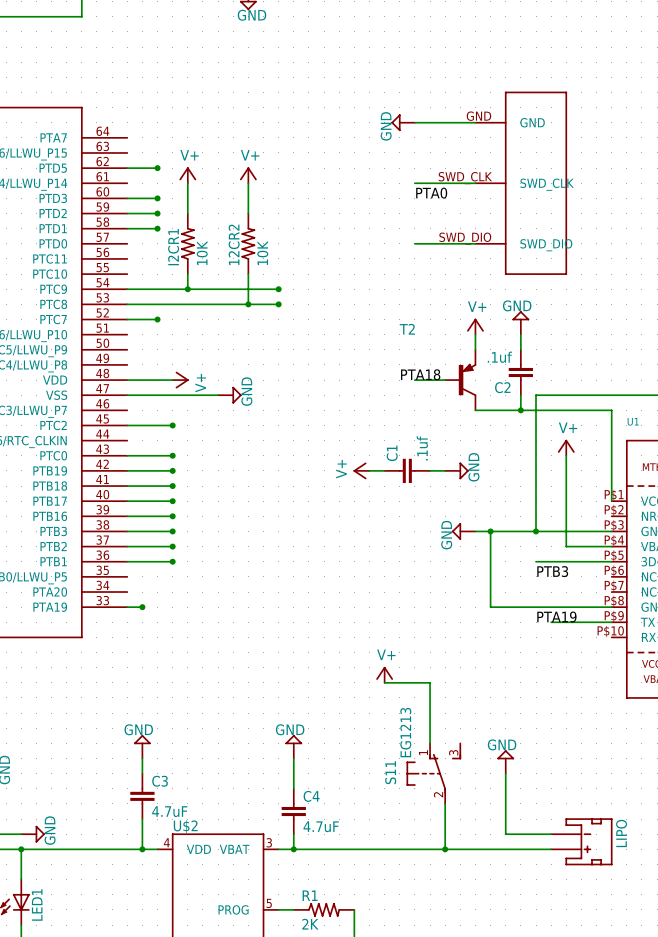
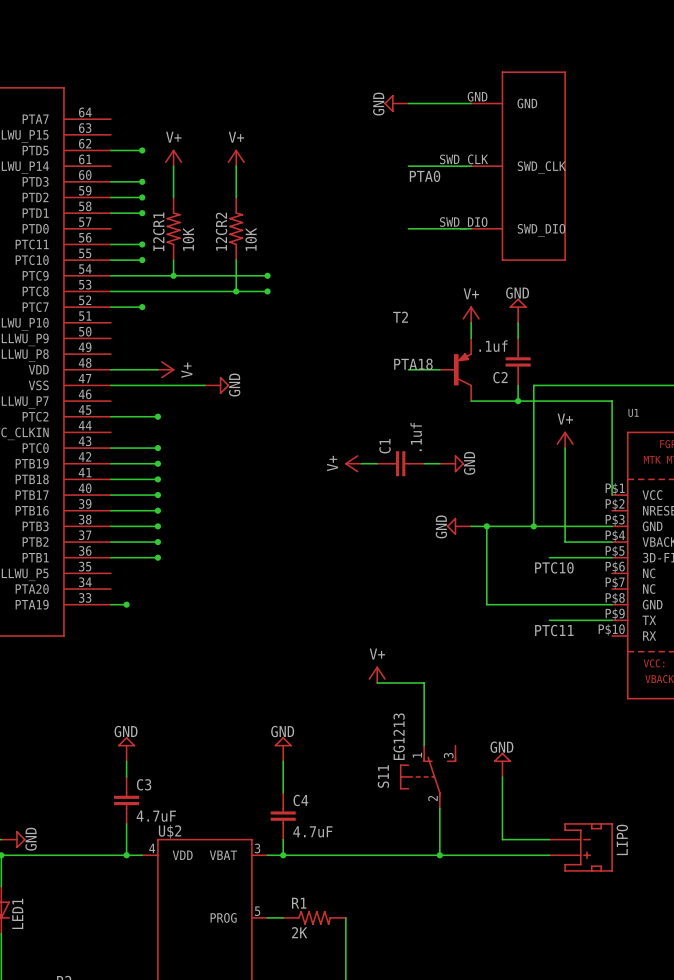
wire: none -> (110, 244) (142, 244)
junction: none -> (142, 244)
wire: none -> (110, 260) (142, 260)
junction: none -> (142, 260)
wire: (536, 561) (551, 561) -> none
label: PTB3 (552, 571) -> PTC10 (554, 567)
label: PTA19 (556, 616) -> none
label: none -> PTC11 (554, 630)

